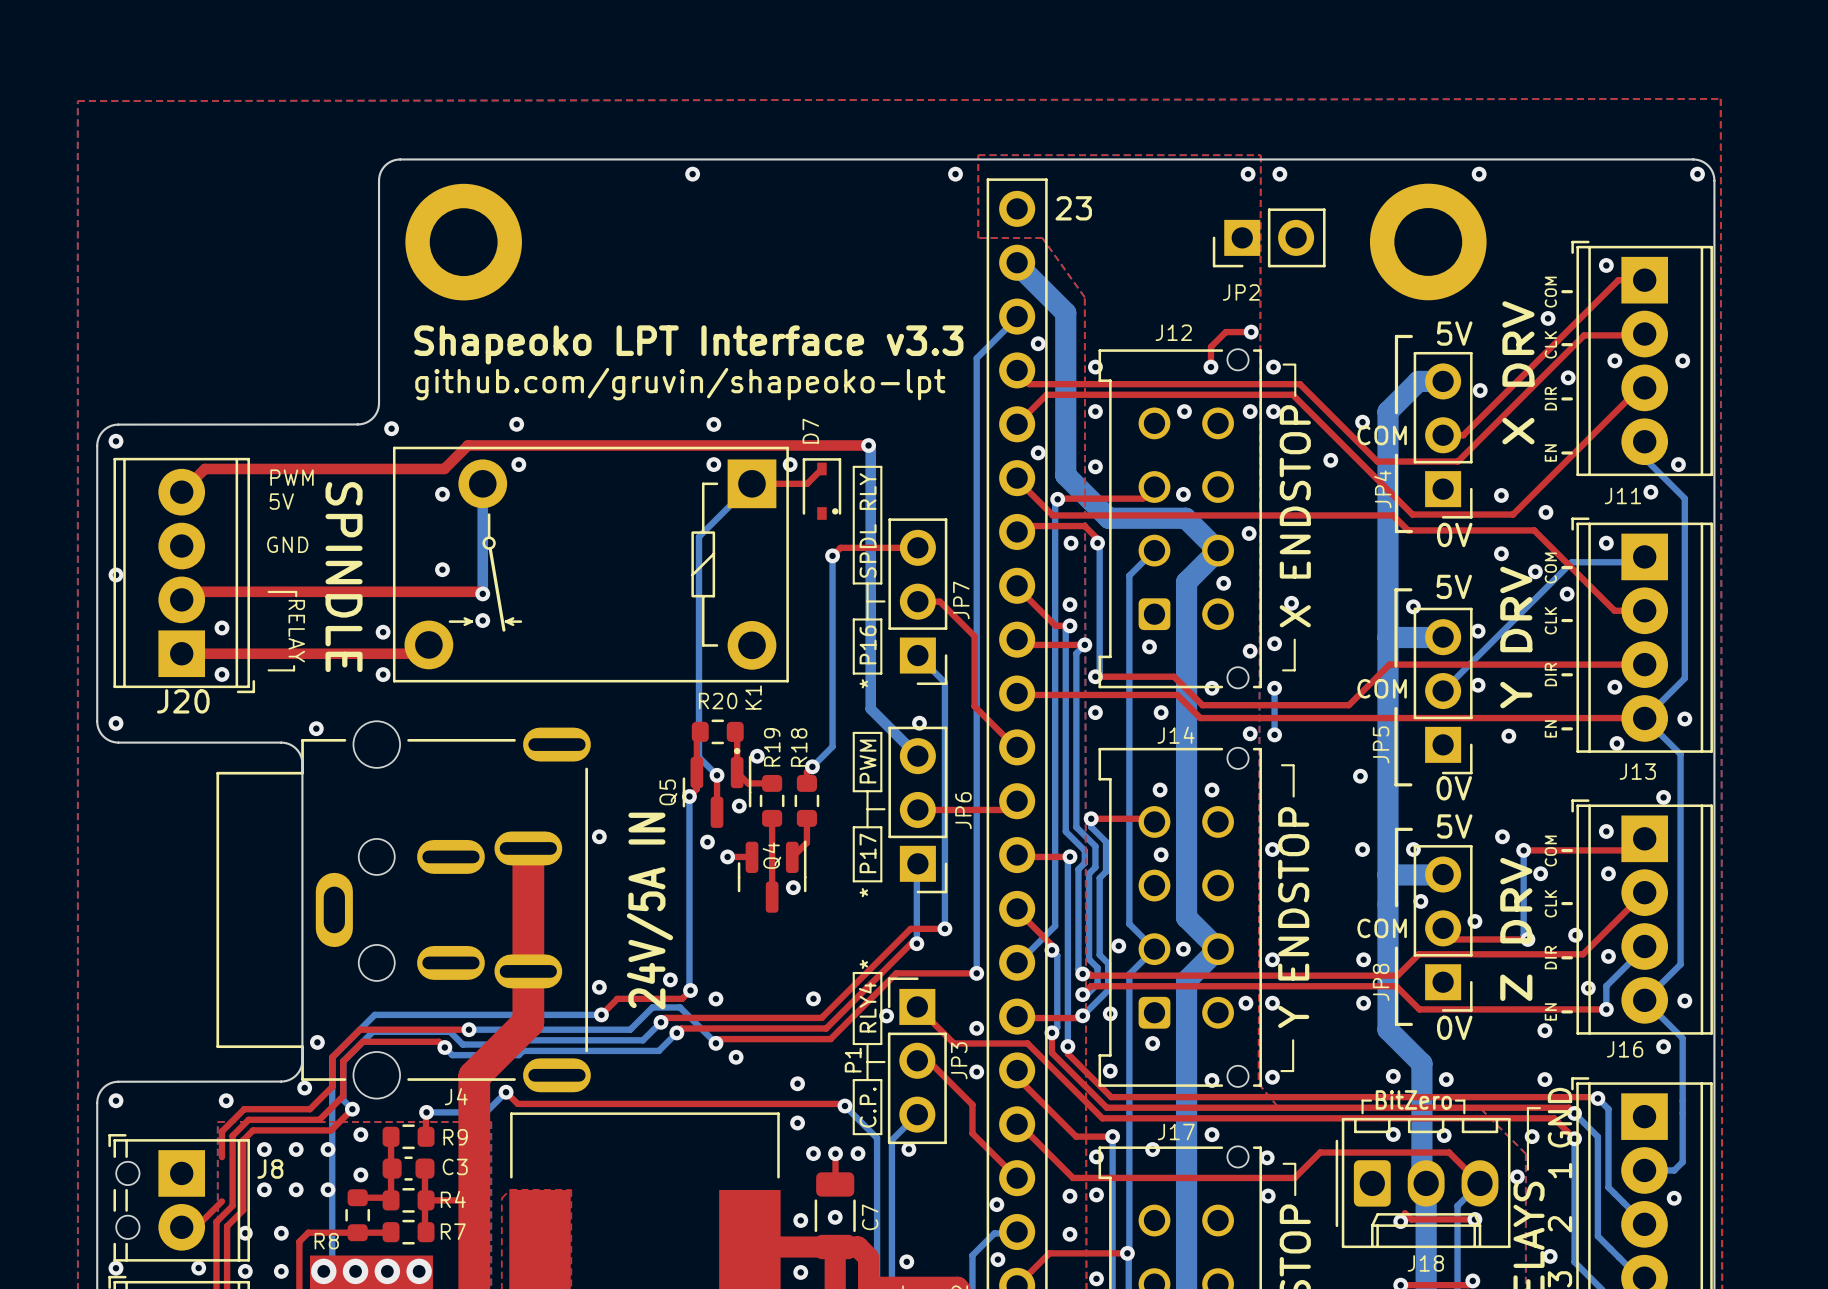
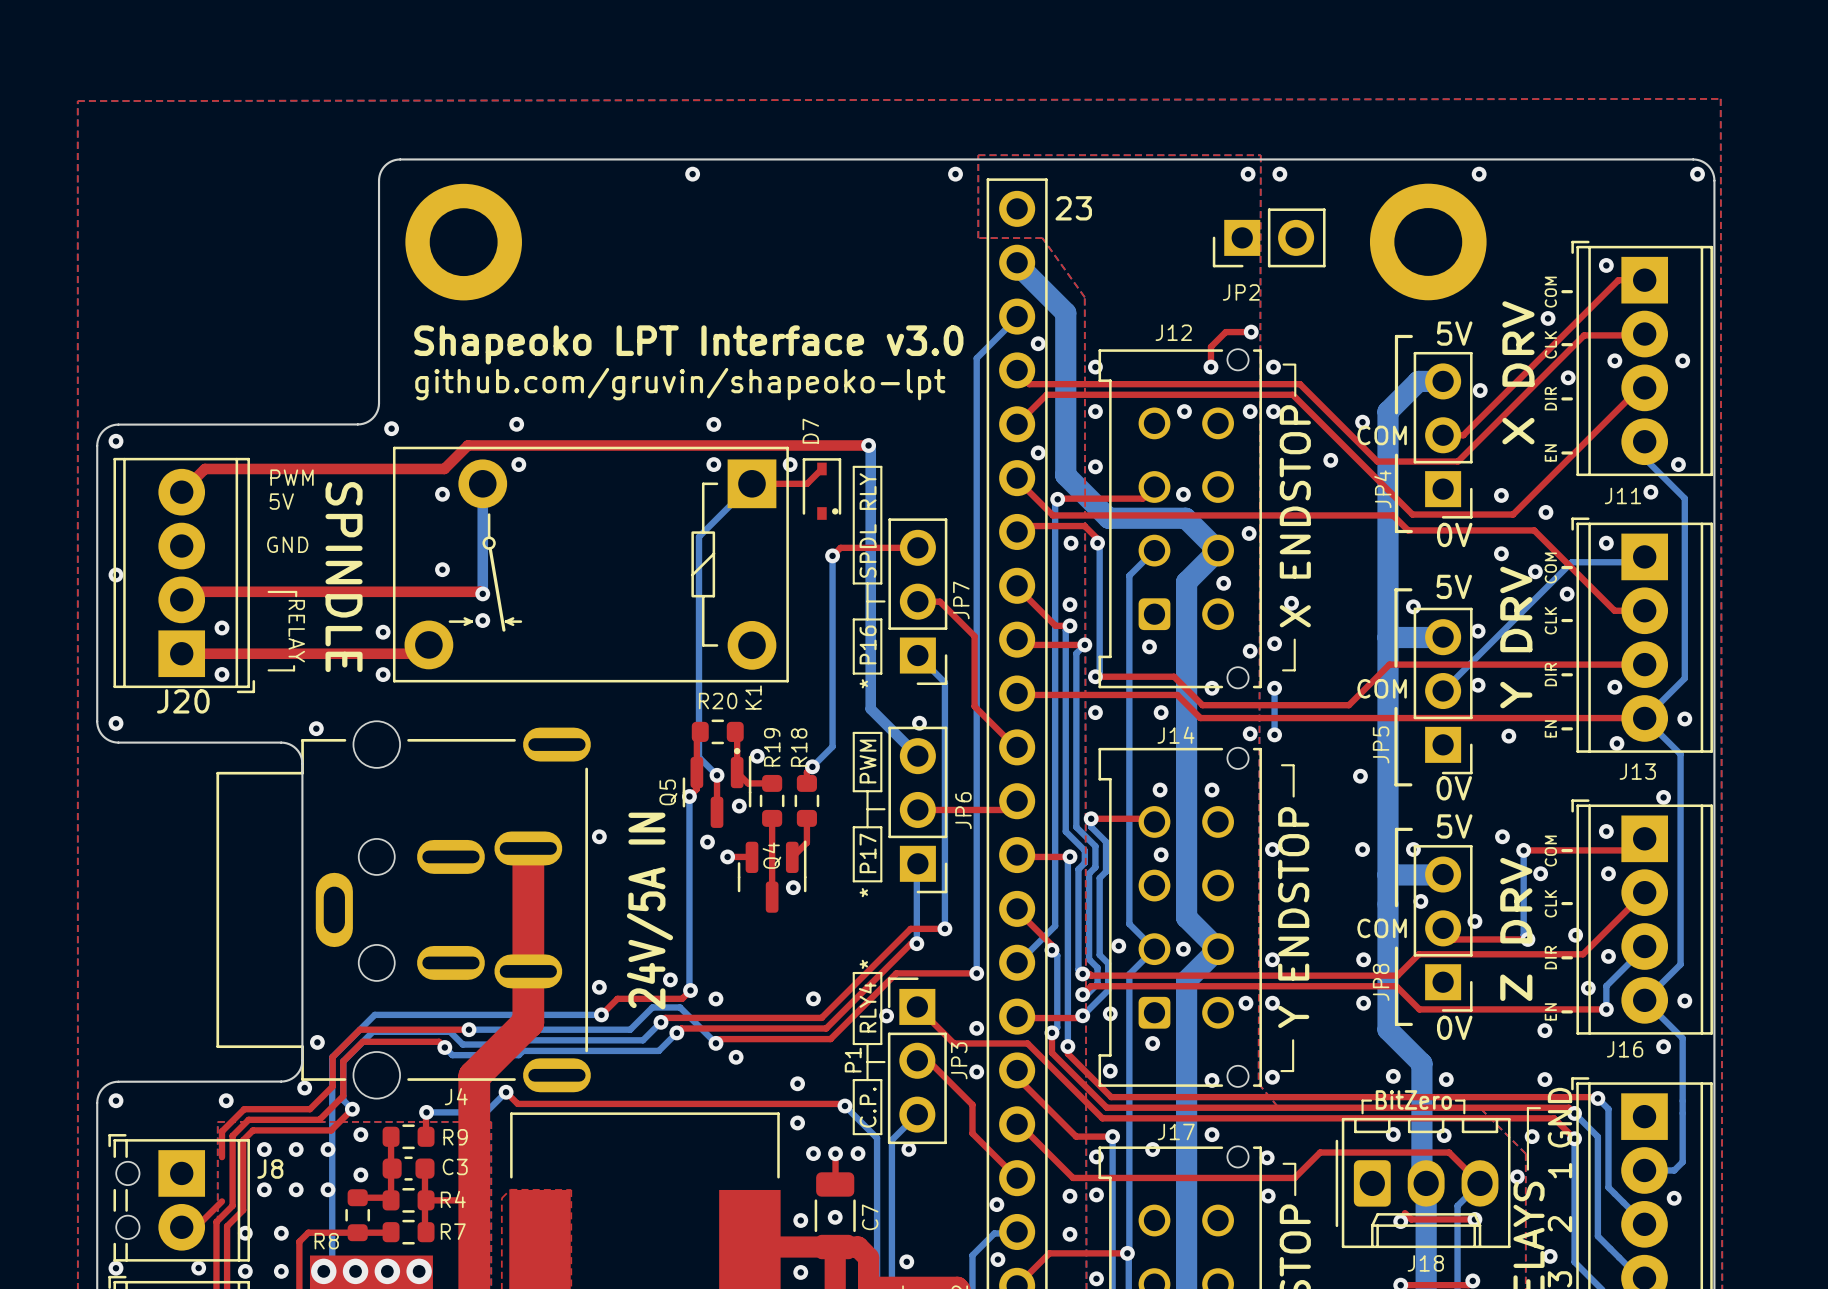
text: Shapeoko LPT Interface v3.3 (688, 344) -> Shapeoko LPT Interface v3.0 (688, 344)

